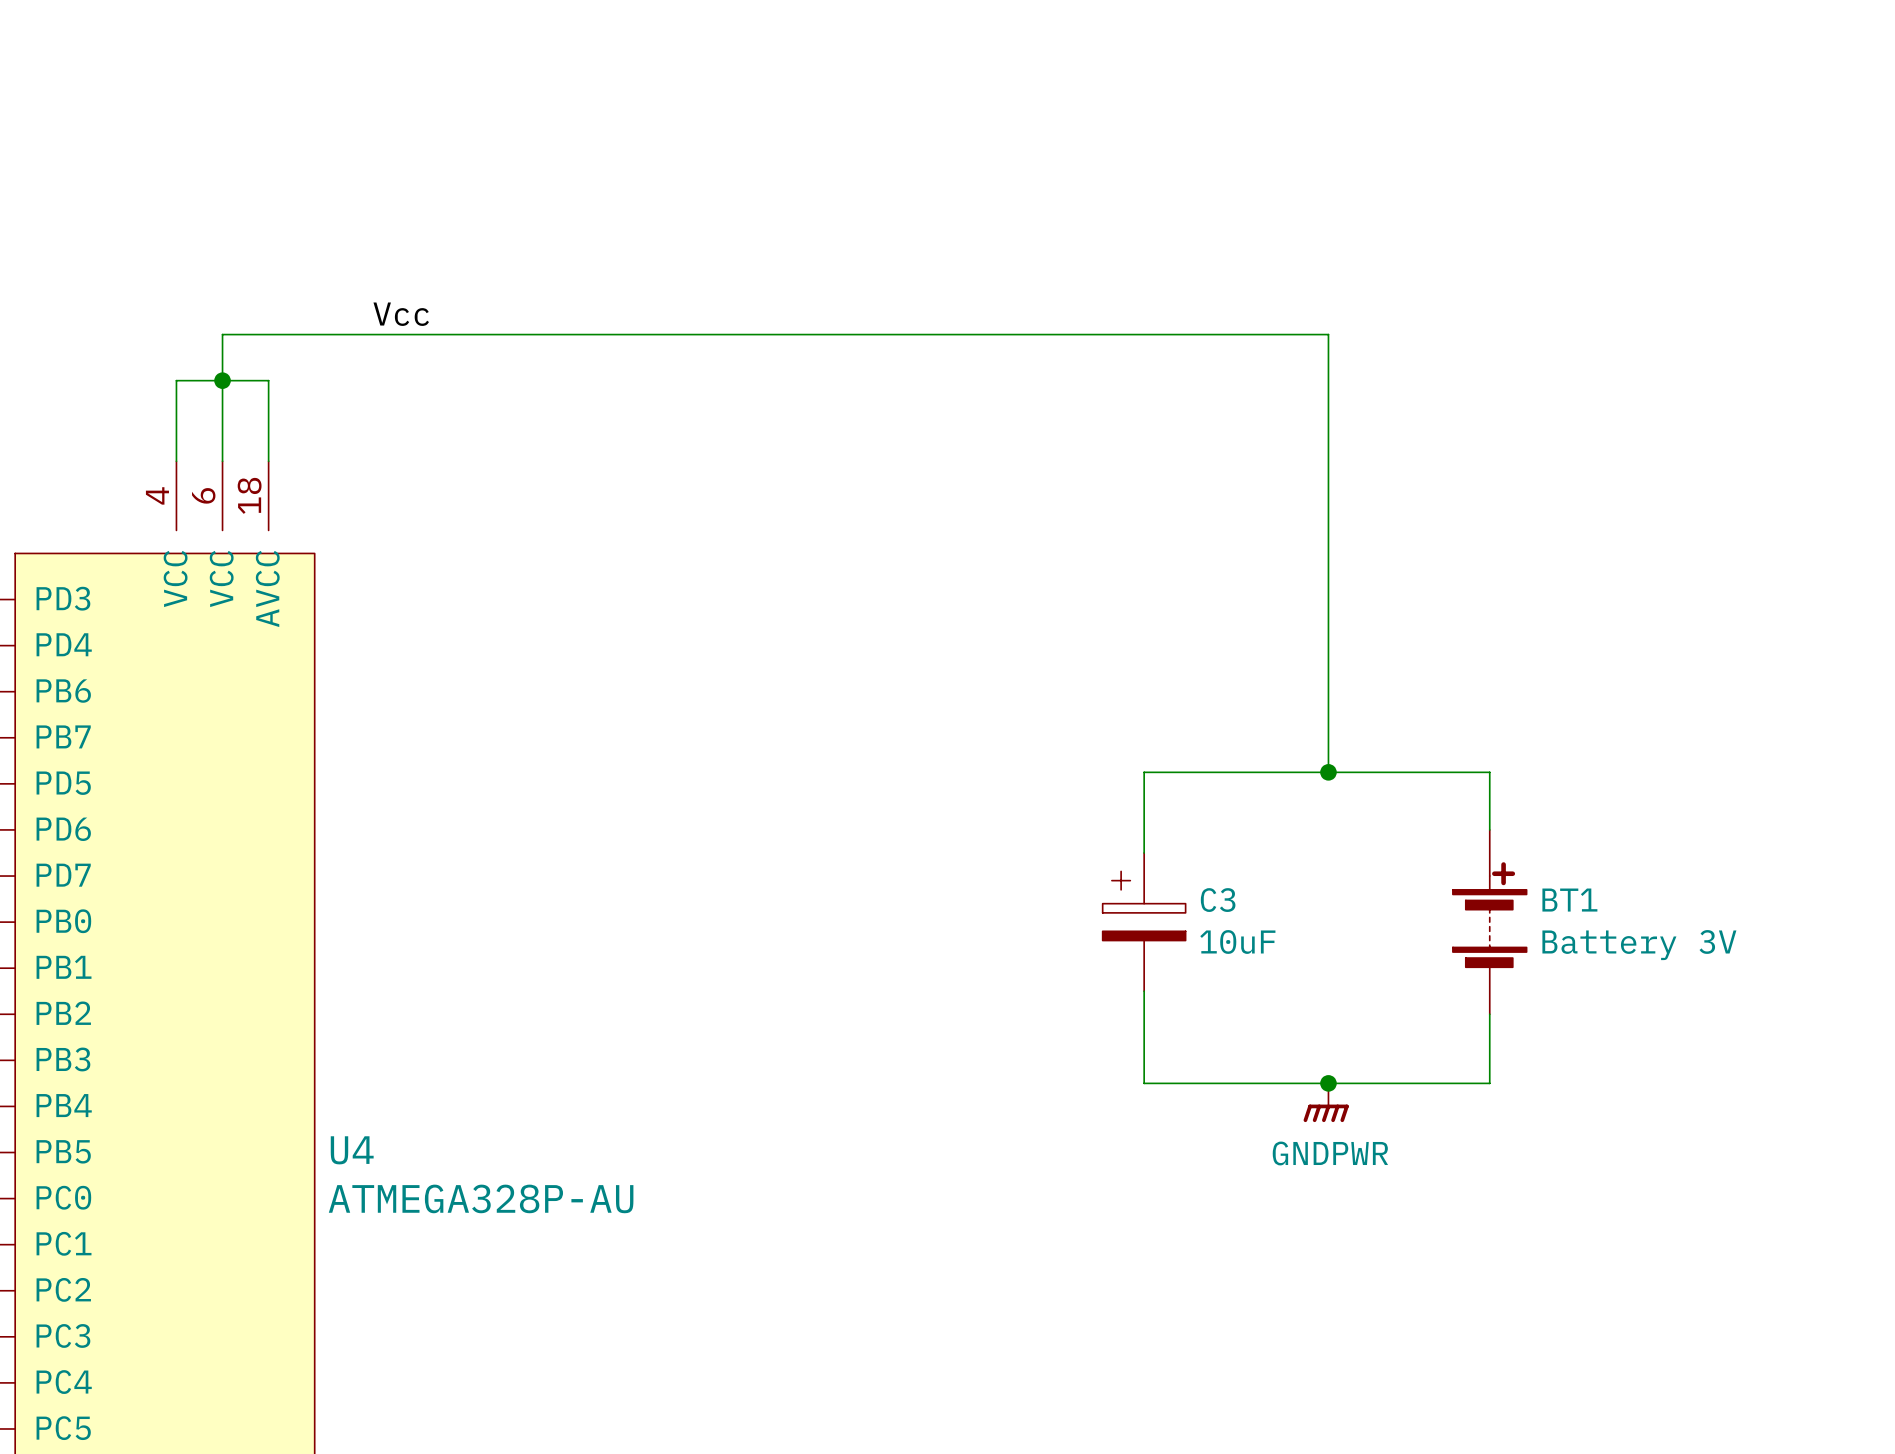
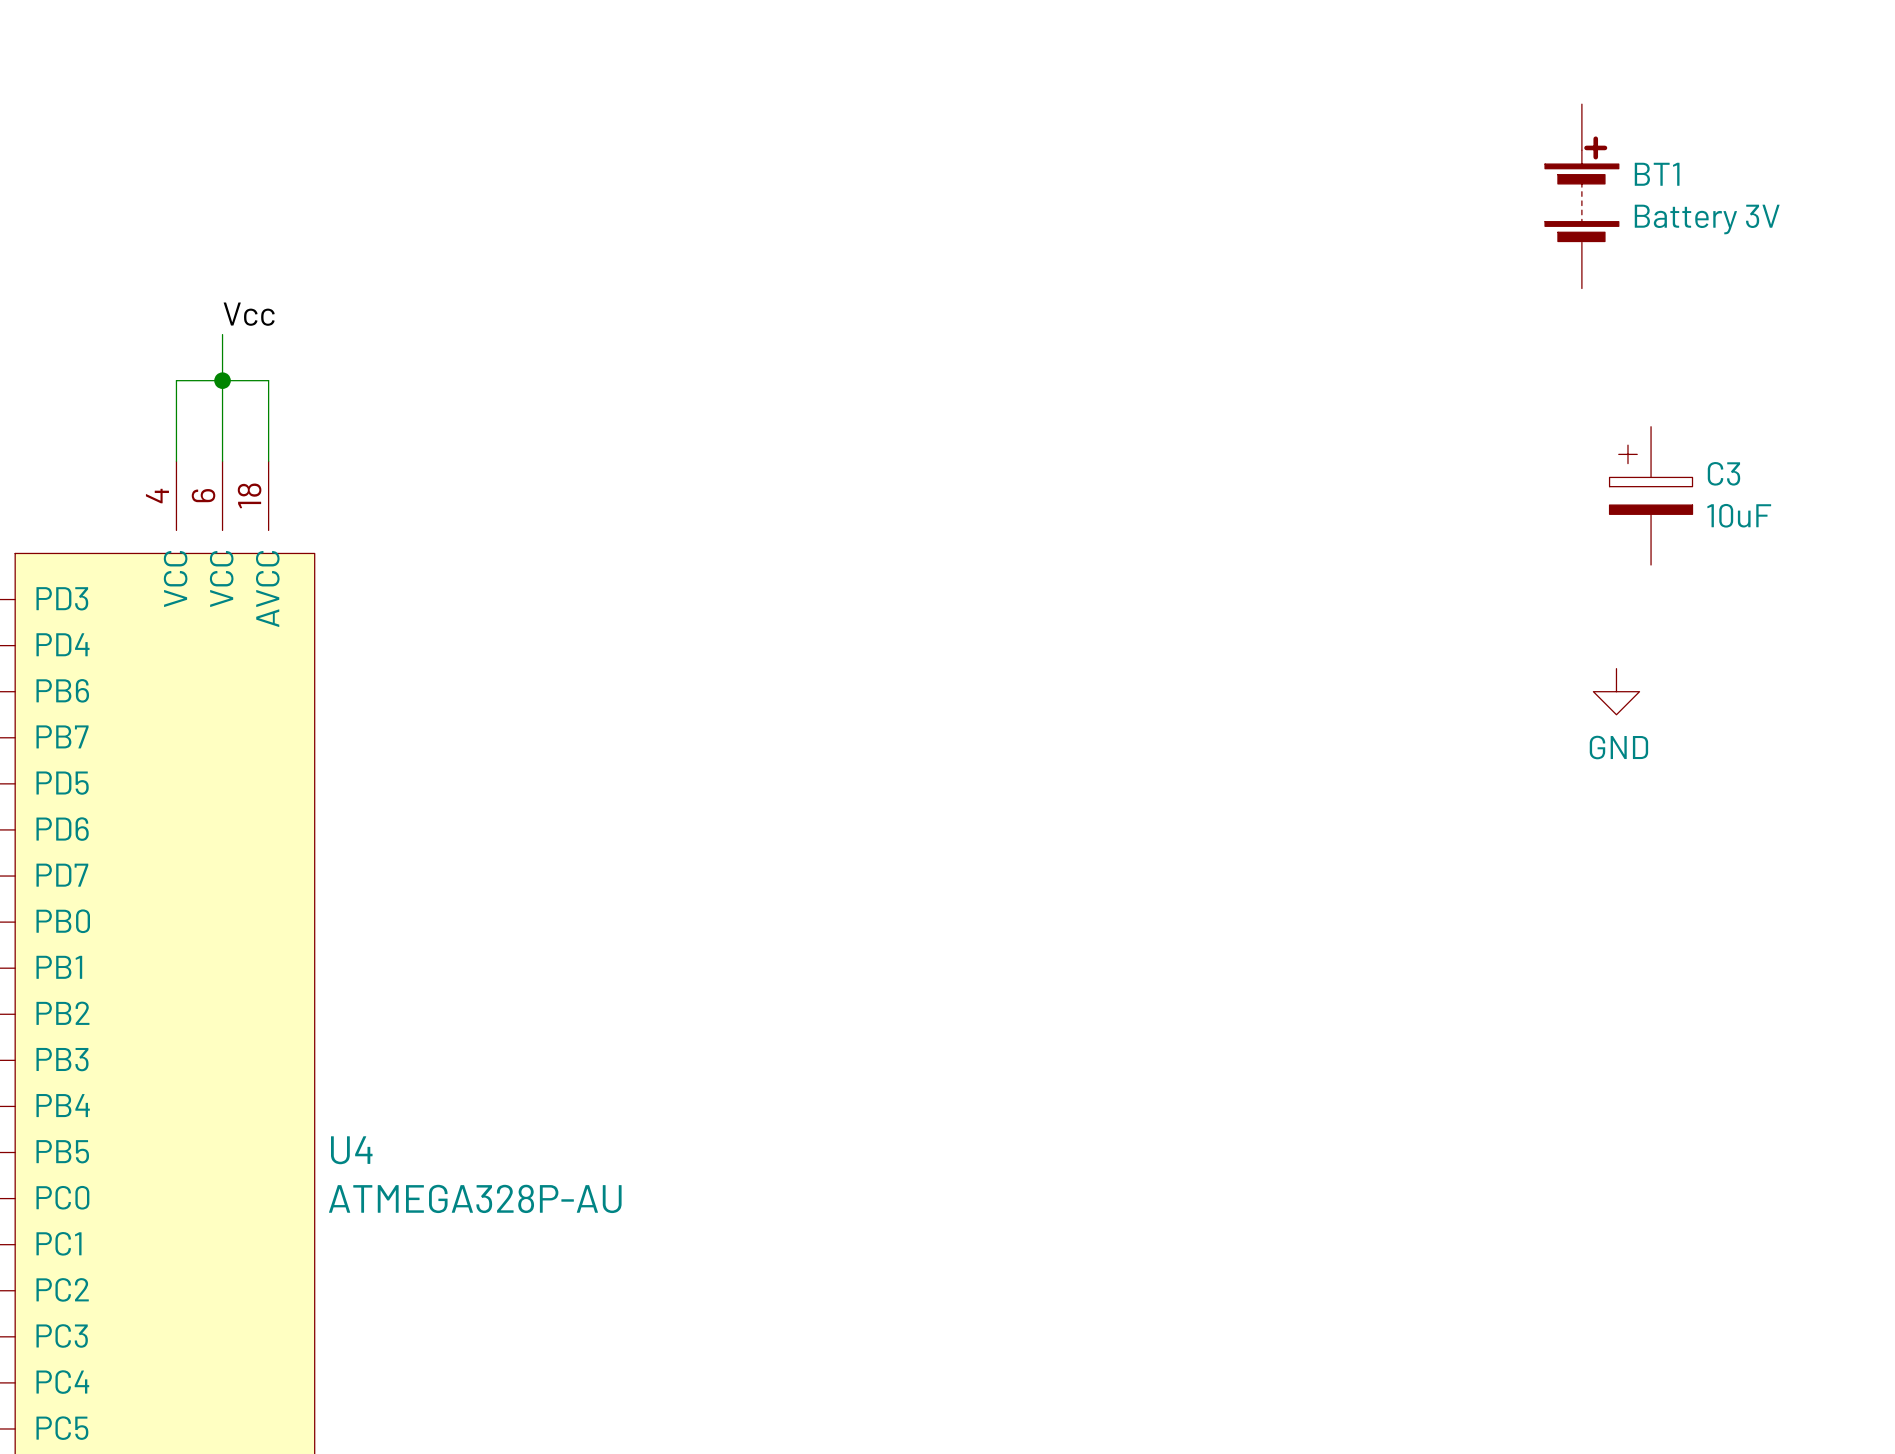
label position: Vcc (401, 314) -> Vcc (249, 314)
wire: (222, 334) (1328, 334) (1328, 772) -> none
power symbol: none -> GND (1616, 691)
junction: (1328, 772) -> none
wire: (1489, 829) (1489, 772) (1144, 772) (1144, 852) -> none
C3 position: (1144, 922) -> (1651, 495)
BT1 position: (1489, 922) -> (1581, 196)
wire: (1144, 991) (1144, 1083) (1489, 1083) (1489, 1014) -> none
junction: (1328, 1083) -> none
power symbol: GNDPWR (1326, 1102) -> none

